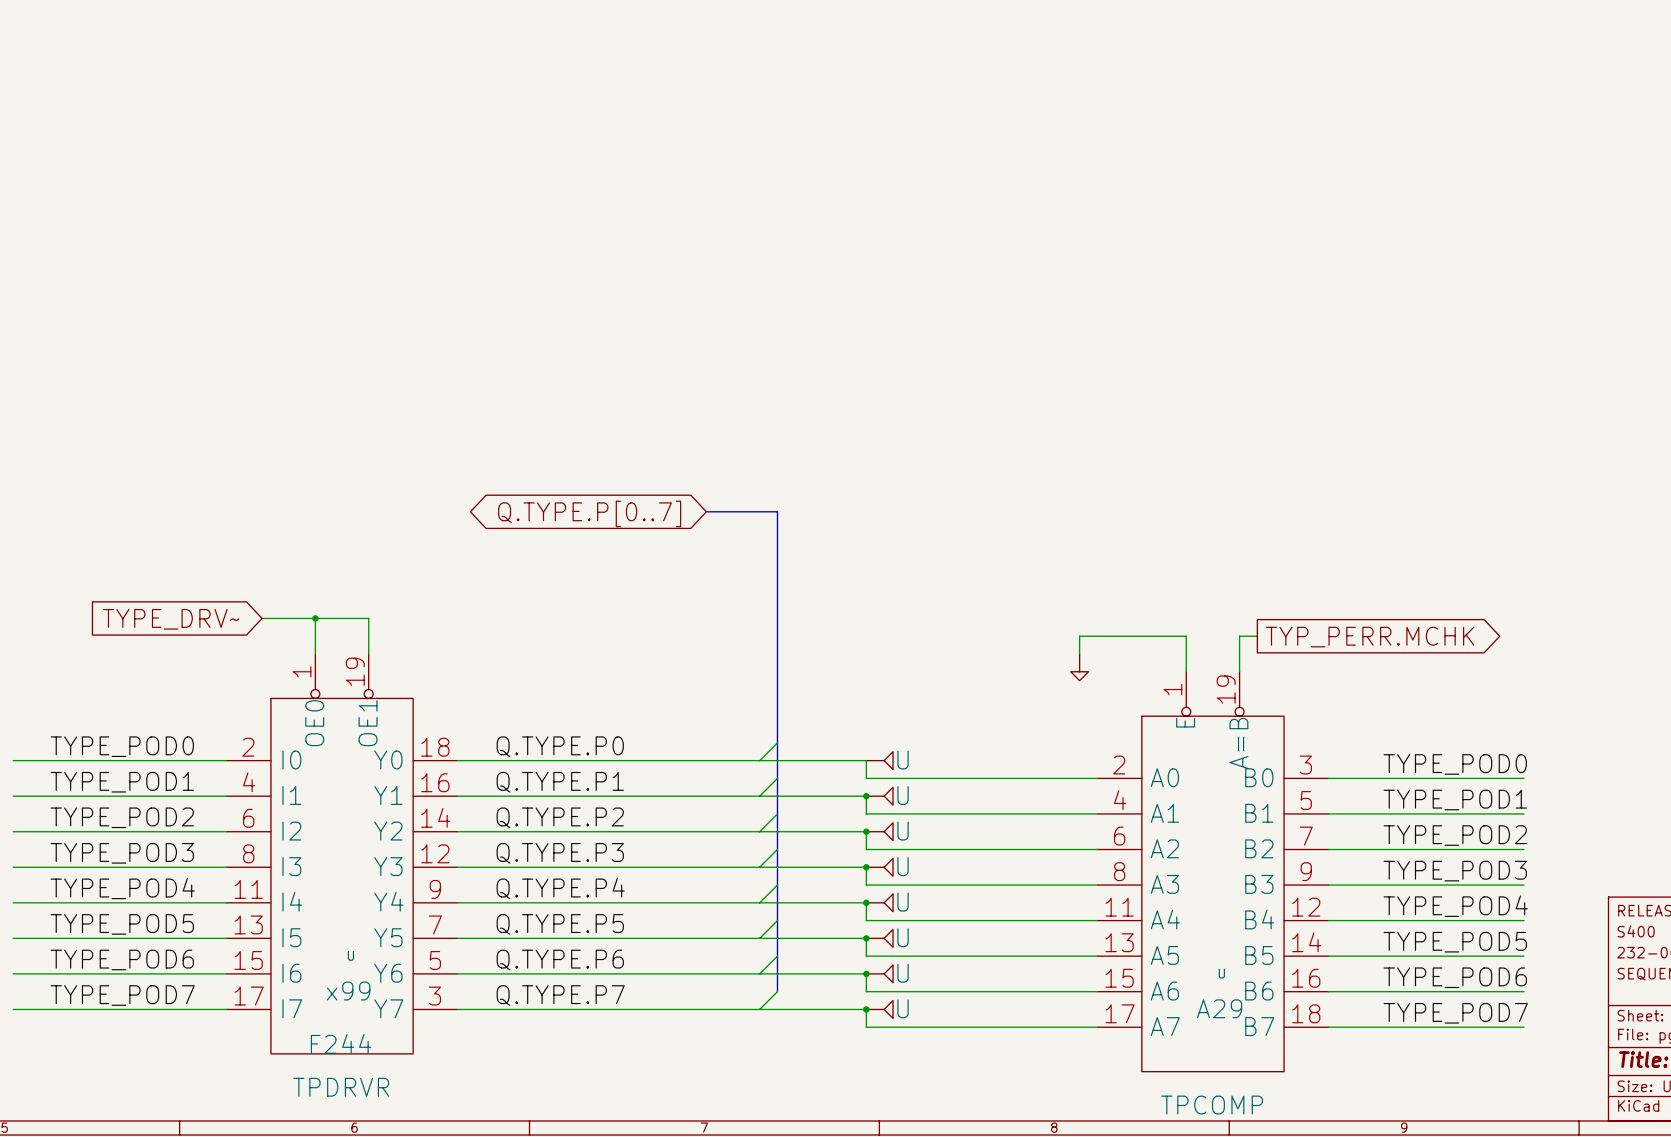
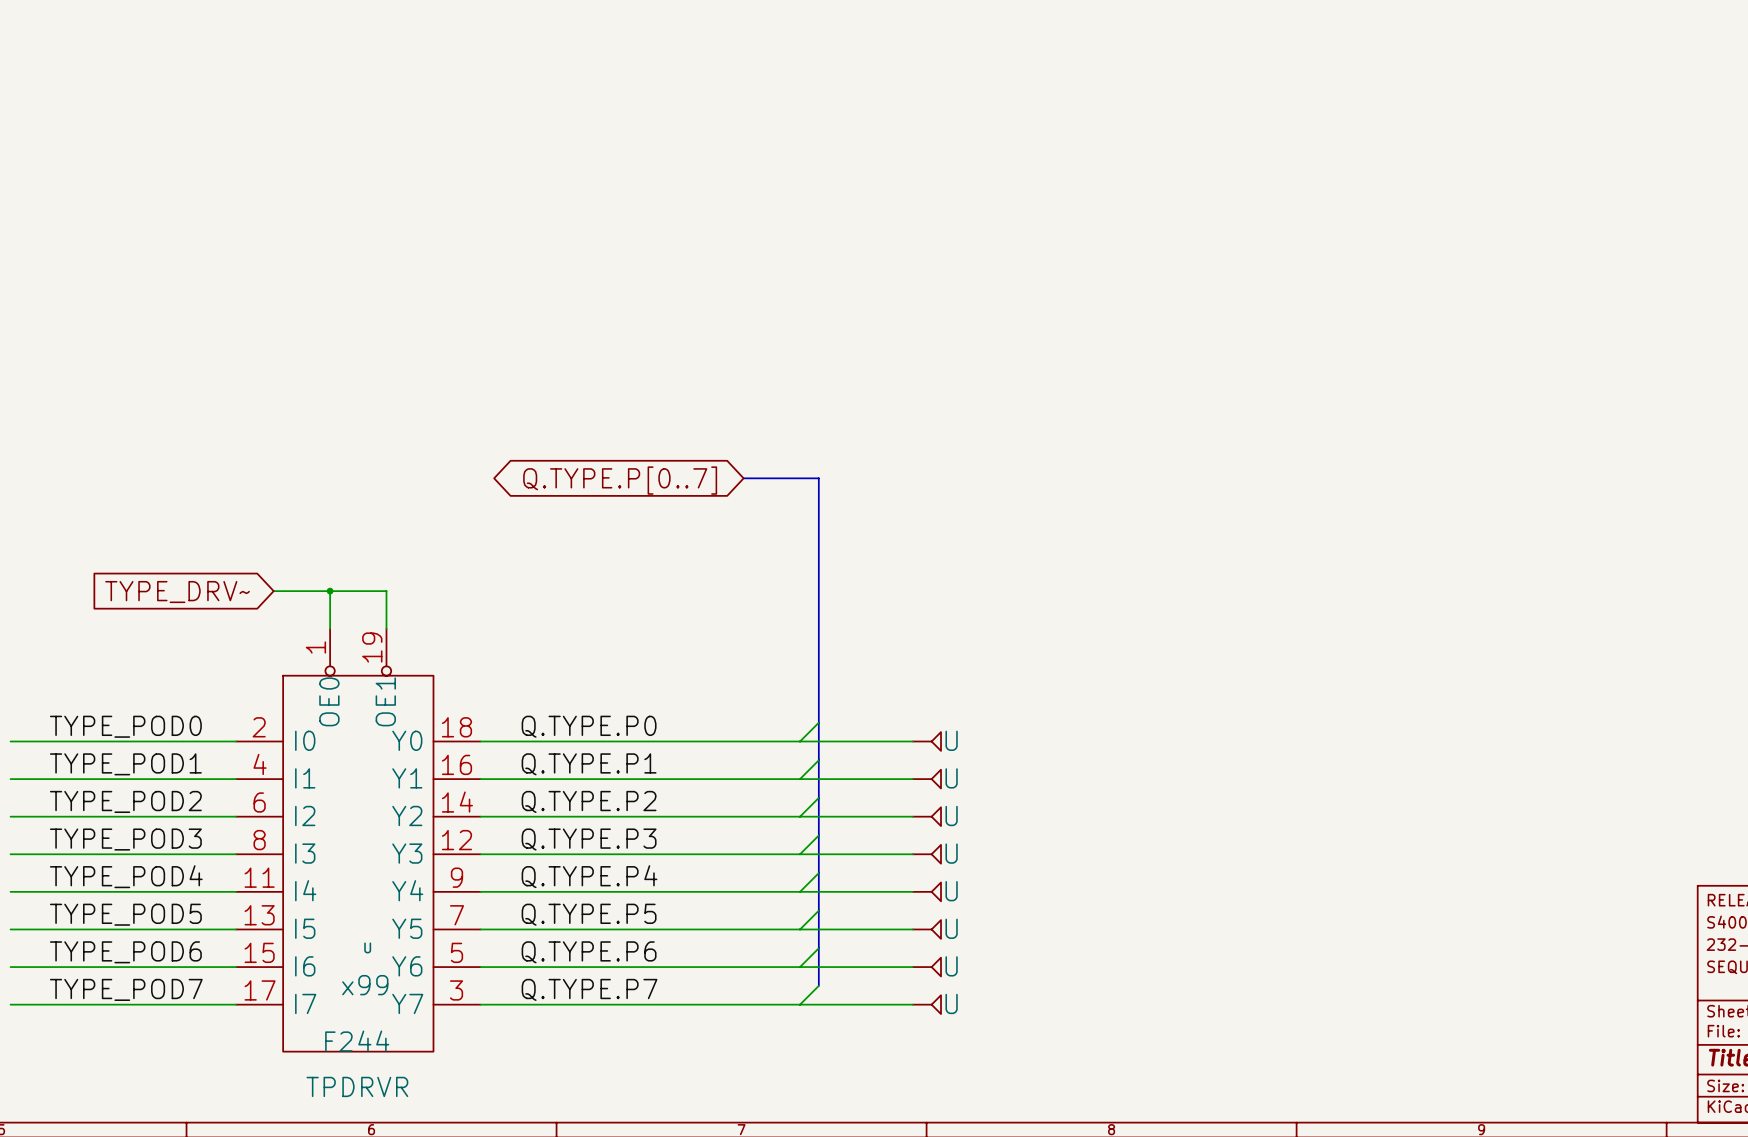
wire: (1257, 636) (1239, 636) (1239, 671) -> none
global label: TYP_PERR.MCHK (1370, 637) -> none
wire: (1079, 653) (1079, 636) (1186, 636) (1186, 671) -> none
power symbol: (1079, 667) -> none
wire: (866, 760) (866, 778) (1097, 778) -> none
label: TYPE_POD0 (1455, 764) -> none
wire: (1328, 778) (1523, 778) -> none
wire: (866, 796) (866, 813) (1097, 813) -> none
junction: (866, 796) -> none
label: TYPE_POD1 (1455, 800) -> none
wire: (1328, 813) (1523, 813) -> none
wire: (866, 831) (866, 849) (1097, 849) -> none
junction: (866, 831) -> none
label: TYPE_POD2 (1455, 835) -> none
wire: (1328, 849) (1523, 849) -> none
wire: (866, 867) (866, 885) (1097, 885) -> none
junction: (866, 867) -> none
U: (1212, 871) -> none
label: TYPE_POD3 (1455, 871) -> none
wire: (1328, 885) (1523, 885) -> none
wire: (866, 902) (866, 920) (1097, 920) -> none
junction: (866, 902) -> none
label: TYPE_POD4 (1455, 906) -> none
wire: (1328, 920) (1523, 920) -> none
wire: (866, 938) (866, 956) (1097, 956) -> none
junction: (866, 938) -> none
label: TYPE_POD5 (1455, 942) -> none
wire: (1328, 956) (1523, 956) -> none
wire: (866, 973) (866, 991) (1097, 991) -> none
junction: (866, 973) -> none
label: TYPE_POD6 (1455, 977) -> none
wire: (1328, 991) (1523, 991) -> none
wire: (866, 1009) (866, 1027) (1097, 1027) -> none
junction: (866, 1009) -> none
label: TYPE_POD7 (1455, 1013) -> none
wire: (1328, 1027) (1523, 1027) -> none

